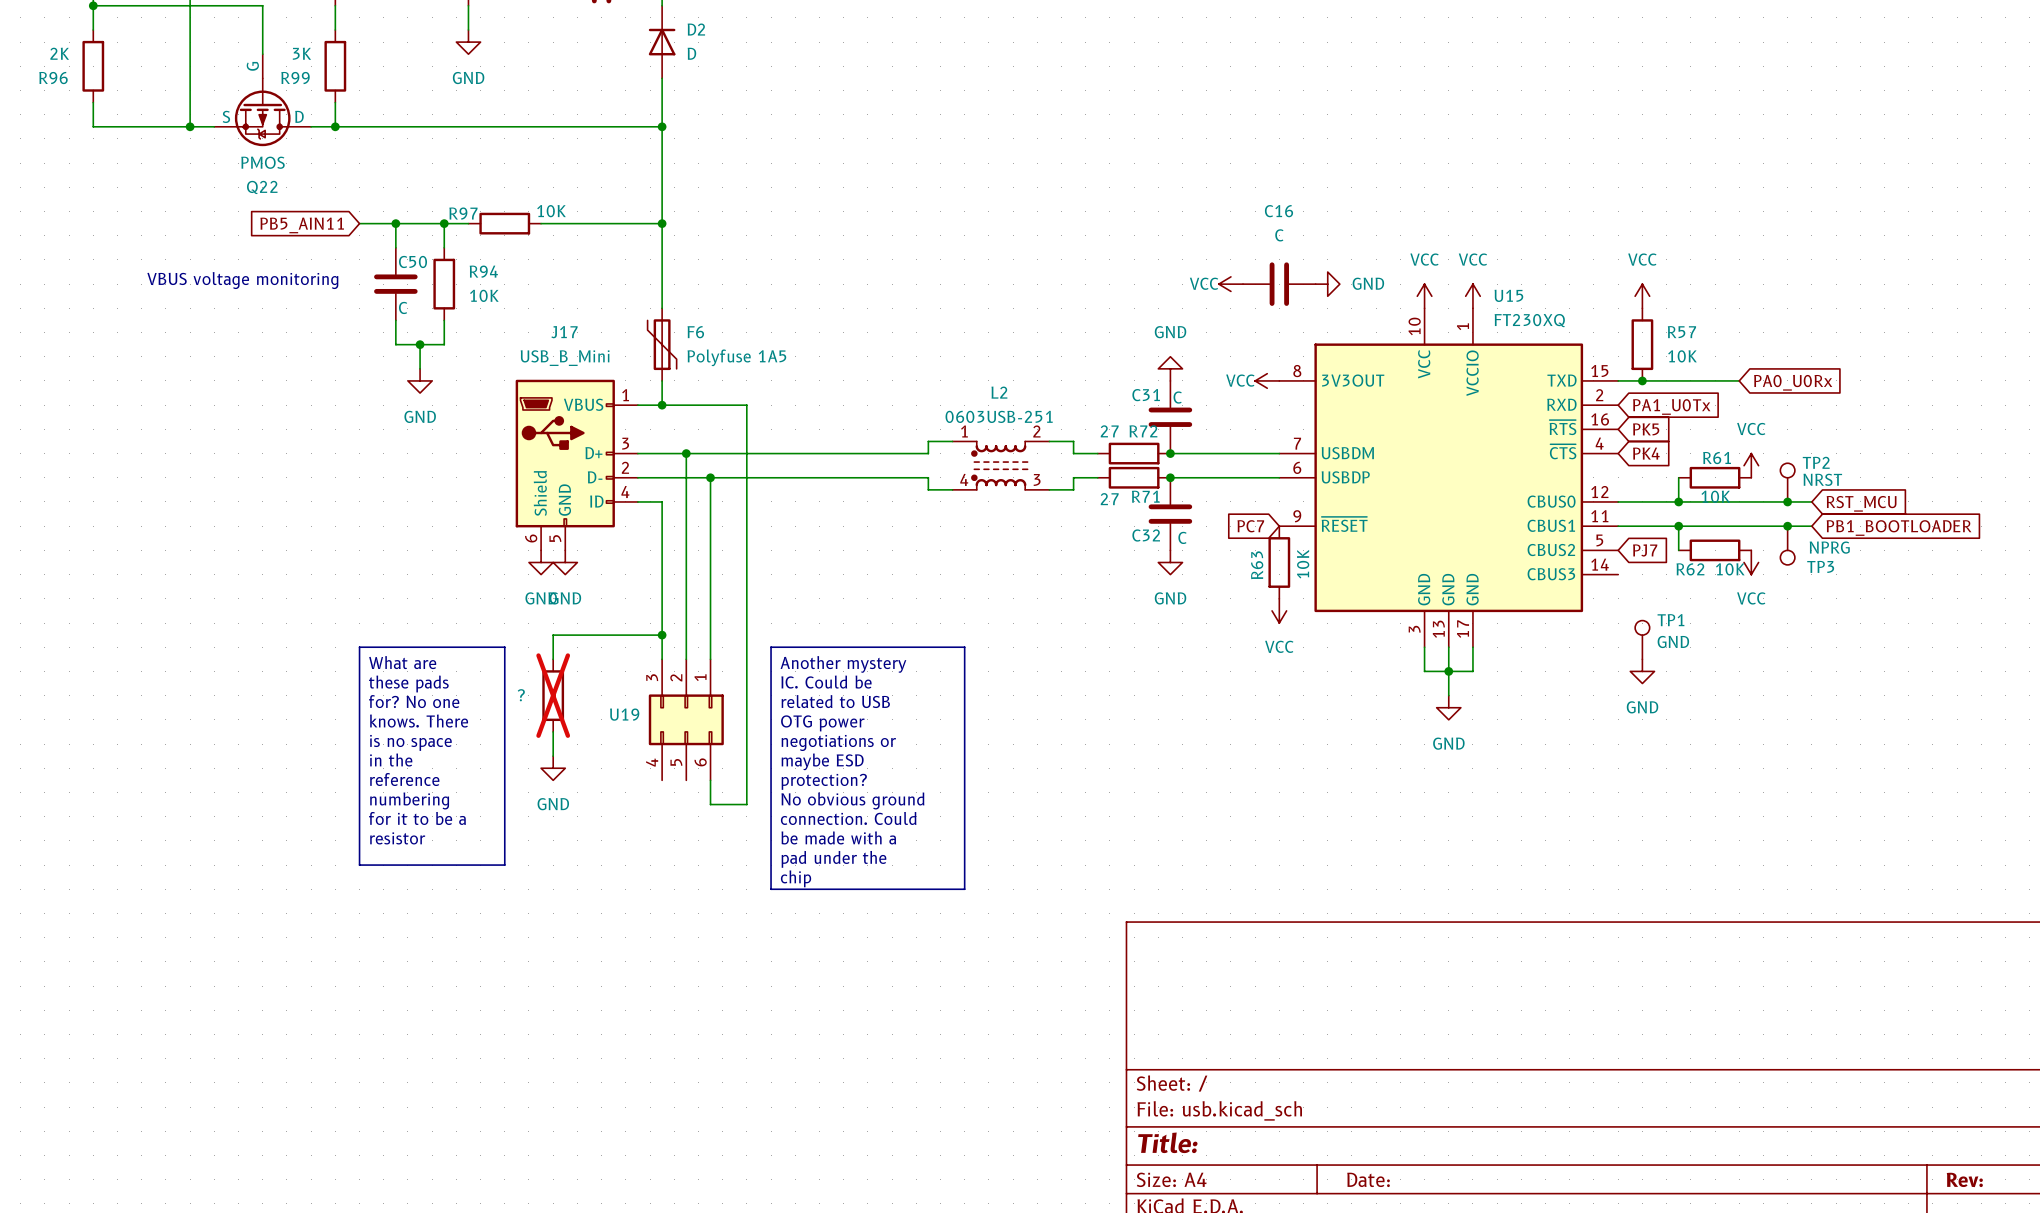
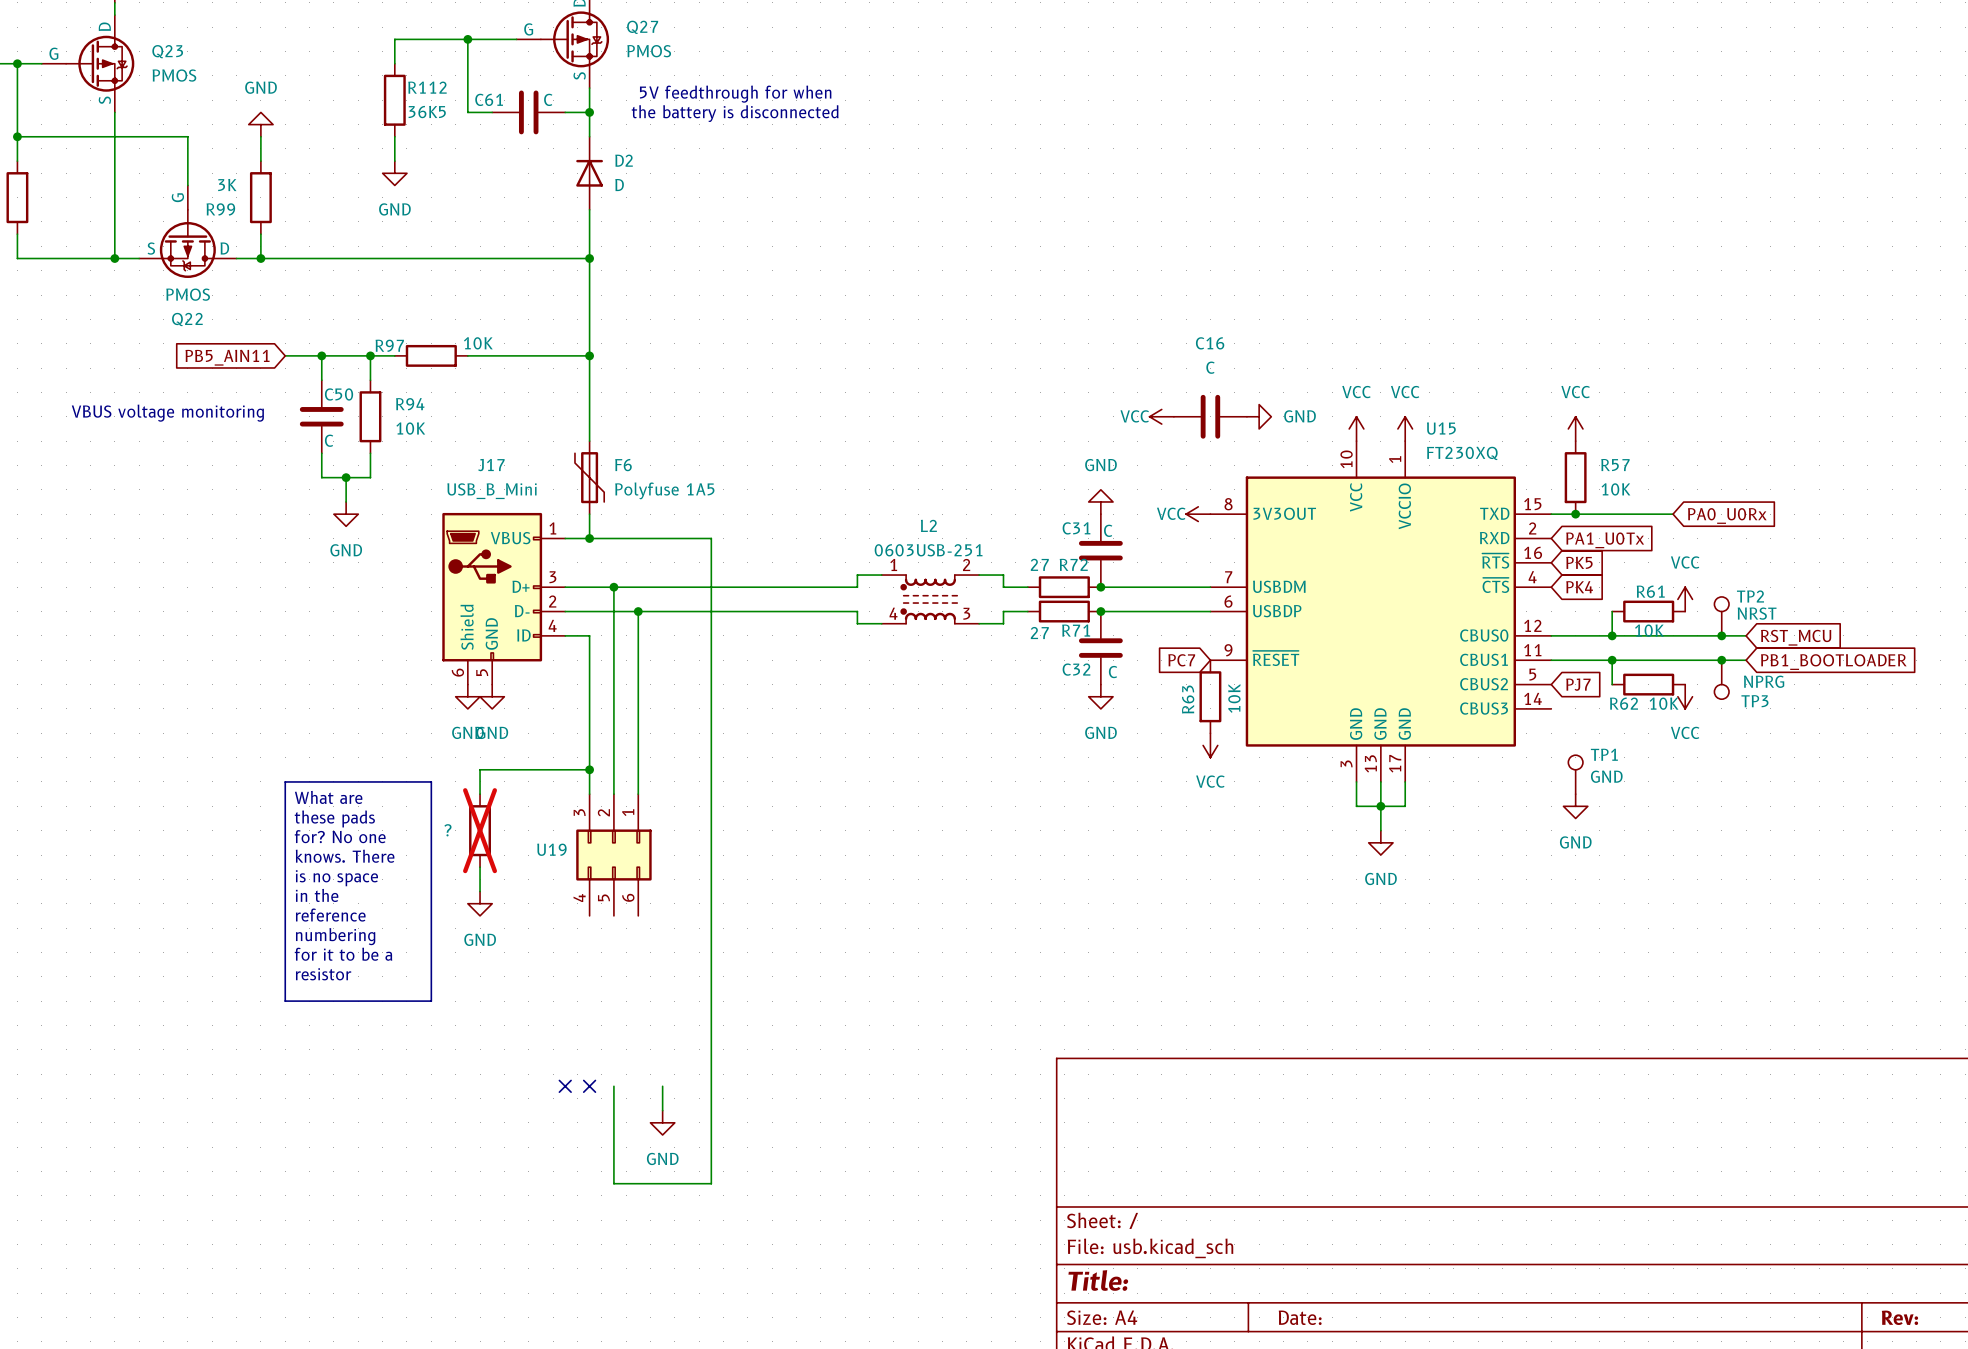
wire: (746, 405) (746, 804) (710, 804) (710, 780) -> (674, 538) (711, 538) (711, 1183) (613, 1183) (613, 1086)
line: (771, 647) (964, 647) (964, 889) (771, 889) (771, 647) -> none
text: Another mystery (843, 664) -> none
text: IC. Could be (826, 682) -> none
text: related to USB (835, 701) -> none
text: OTG power (822, 723) -> none
text: negotiations or (838, 742) -> none
text: maybe ESD (822, 761) -> none
text: protection? (824, 781) -> none
text: No obvious ground (852, 800) -> none
text: connection. Could (848, 818) -> none
text: be made with a (838, 837) -> none
text: pad under the (834, 859) -> none
text: chip (796, 878) -> none
no-connect mark: none -> (565, 1086)
no-connect mark: none -> (589, 1086)
wire: none -> (662, 1086) (662, 1110)
power symbol: none -> GND (662, 1122)

